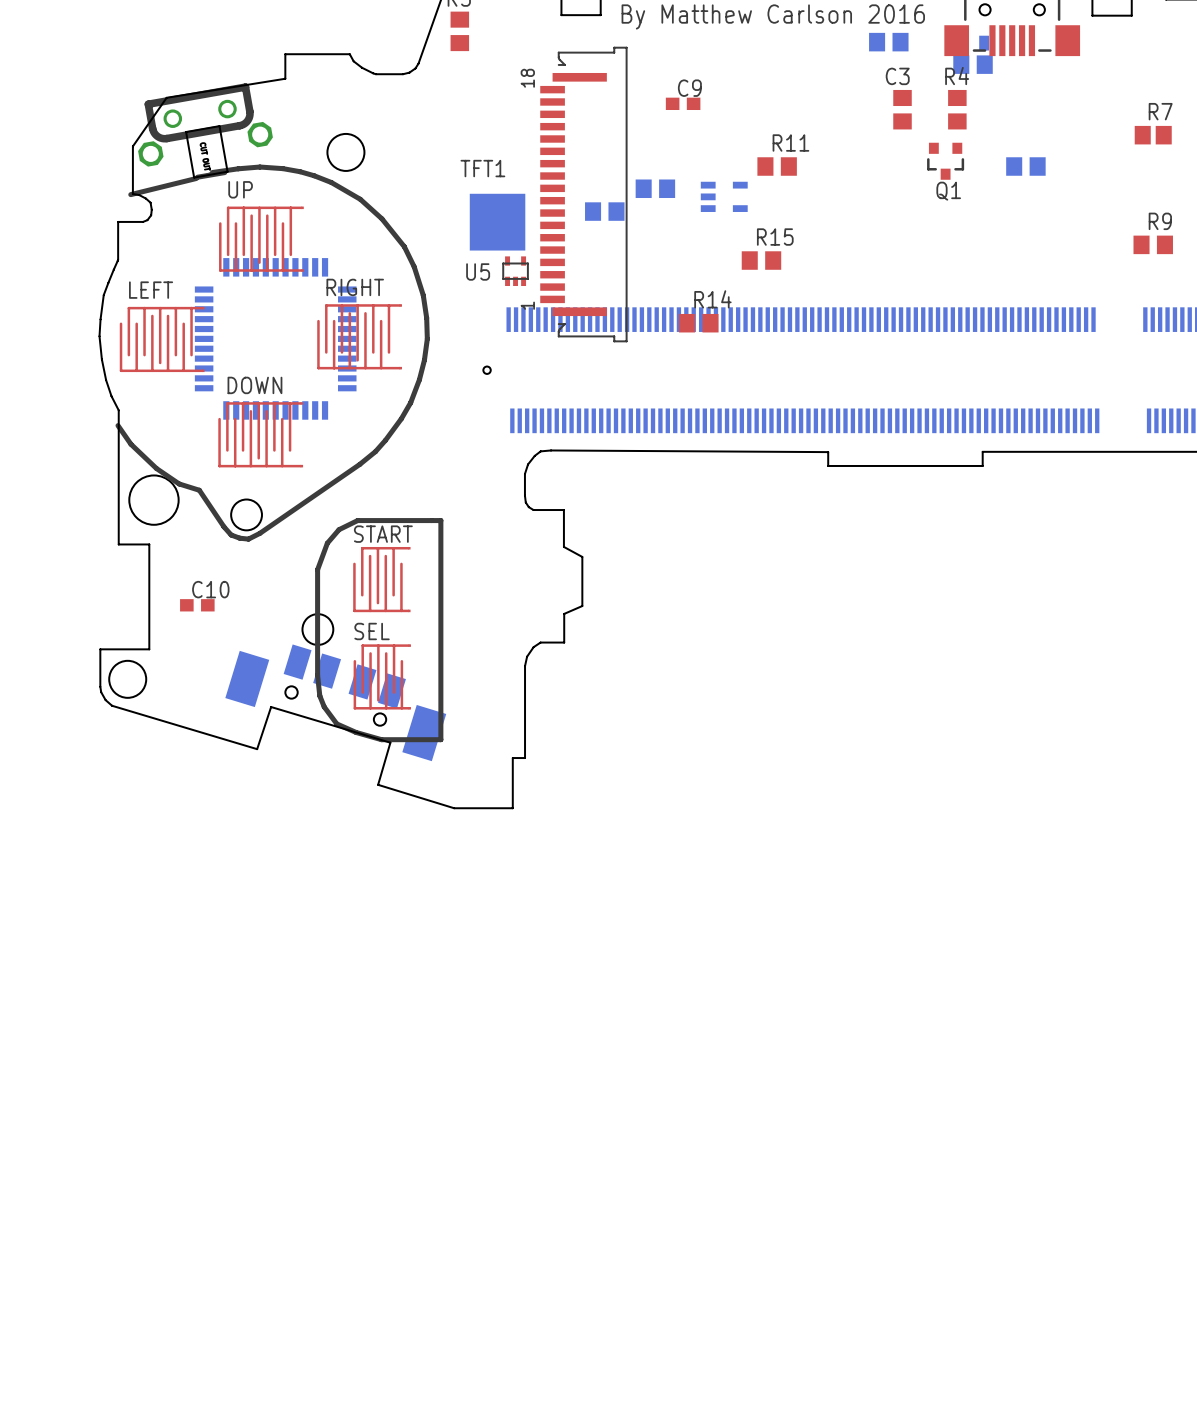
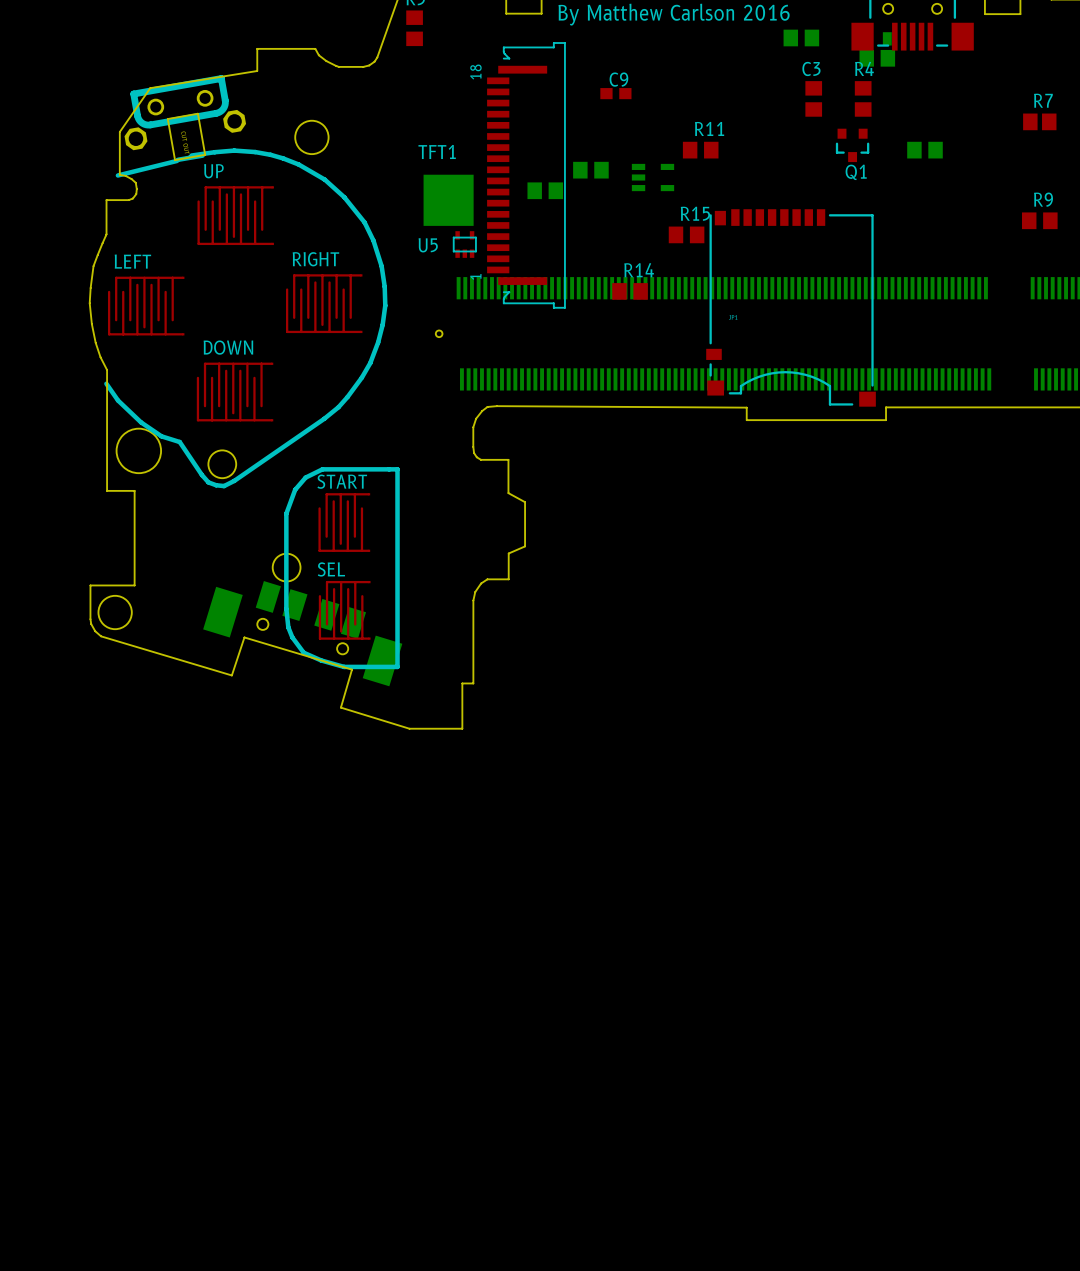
part: (275, 338) -> none
part: none -> (791, 307)
C10: (197, 605) -> none

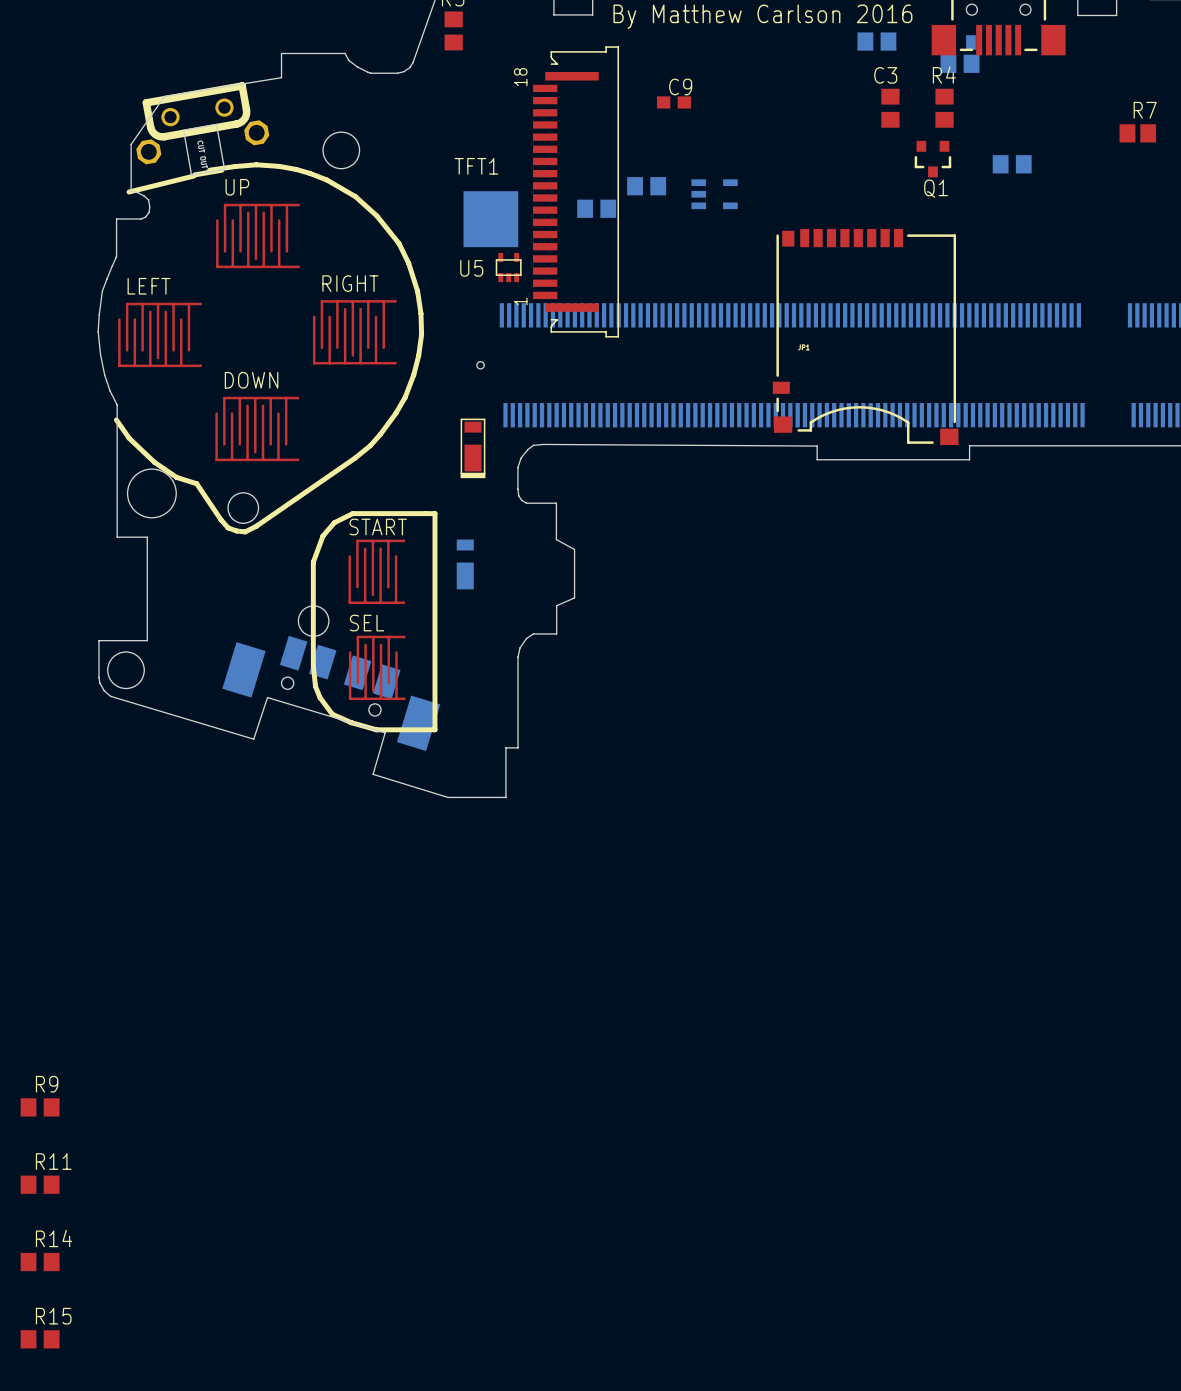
R11 position: (700, 150) -> (40, 1184)
R9 position: (1039, 220) -> (40, 1107)
R15 position: (686, 234) -> (40, 1339)
R14 position: (630, 291) -> (40, 1262)
part: none -> (472, 448)
part: none -> (465, 564)

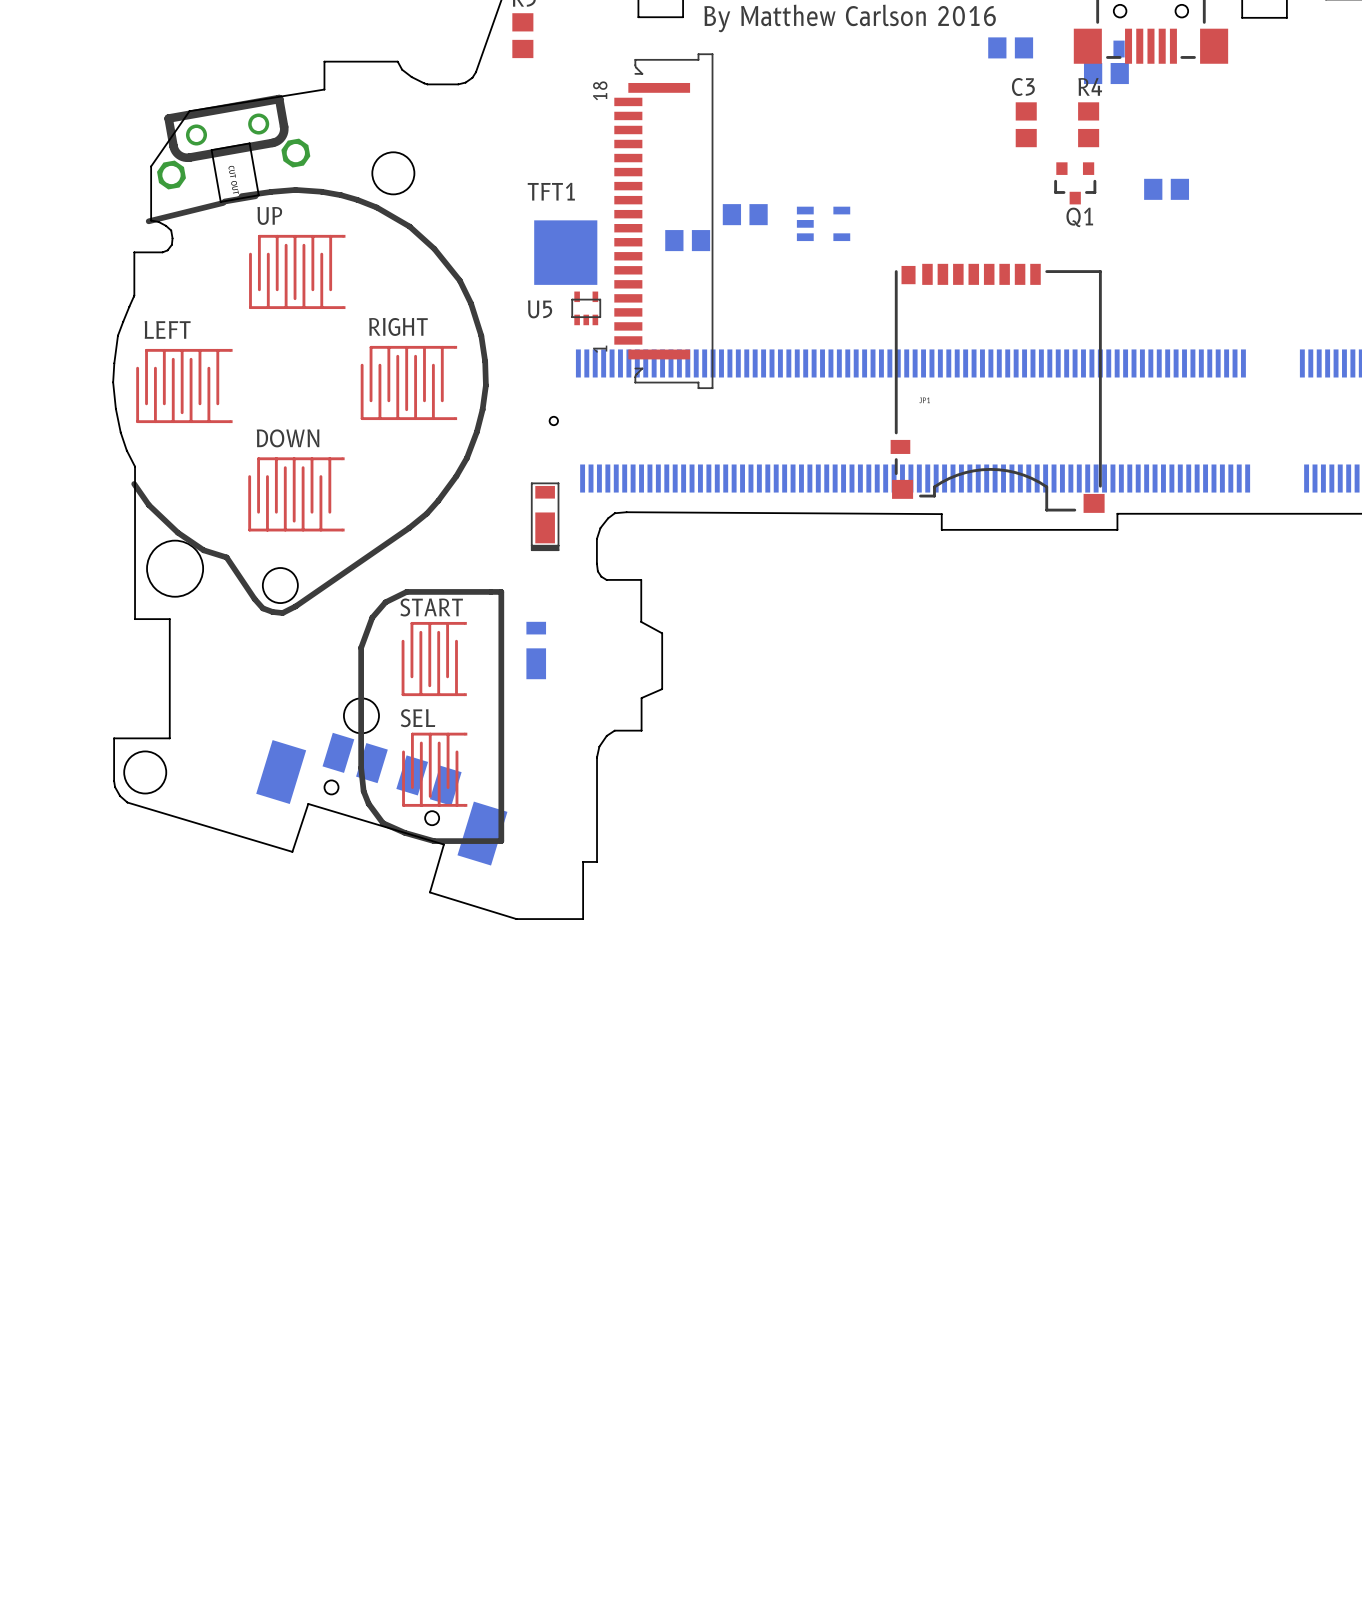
C9: (673, 102) -> none
R7: (1137, 133) -> none
R9: (40, 1107) -> none
R11: (40, 1184) -> none
R14: (40, 1262) -> none
R15: (40, 1339) -> none

